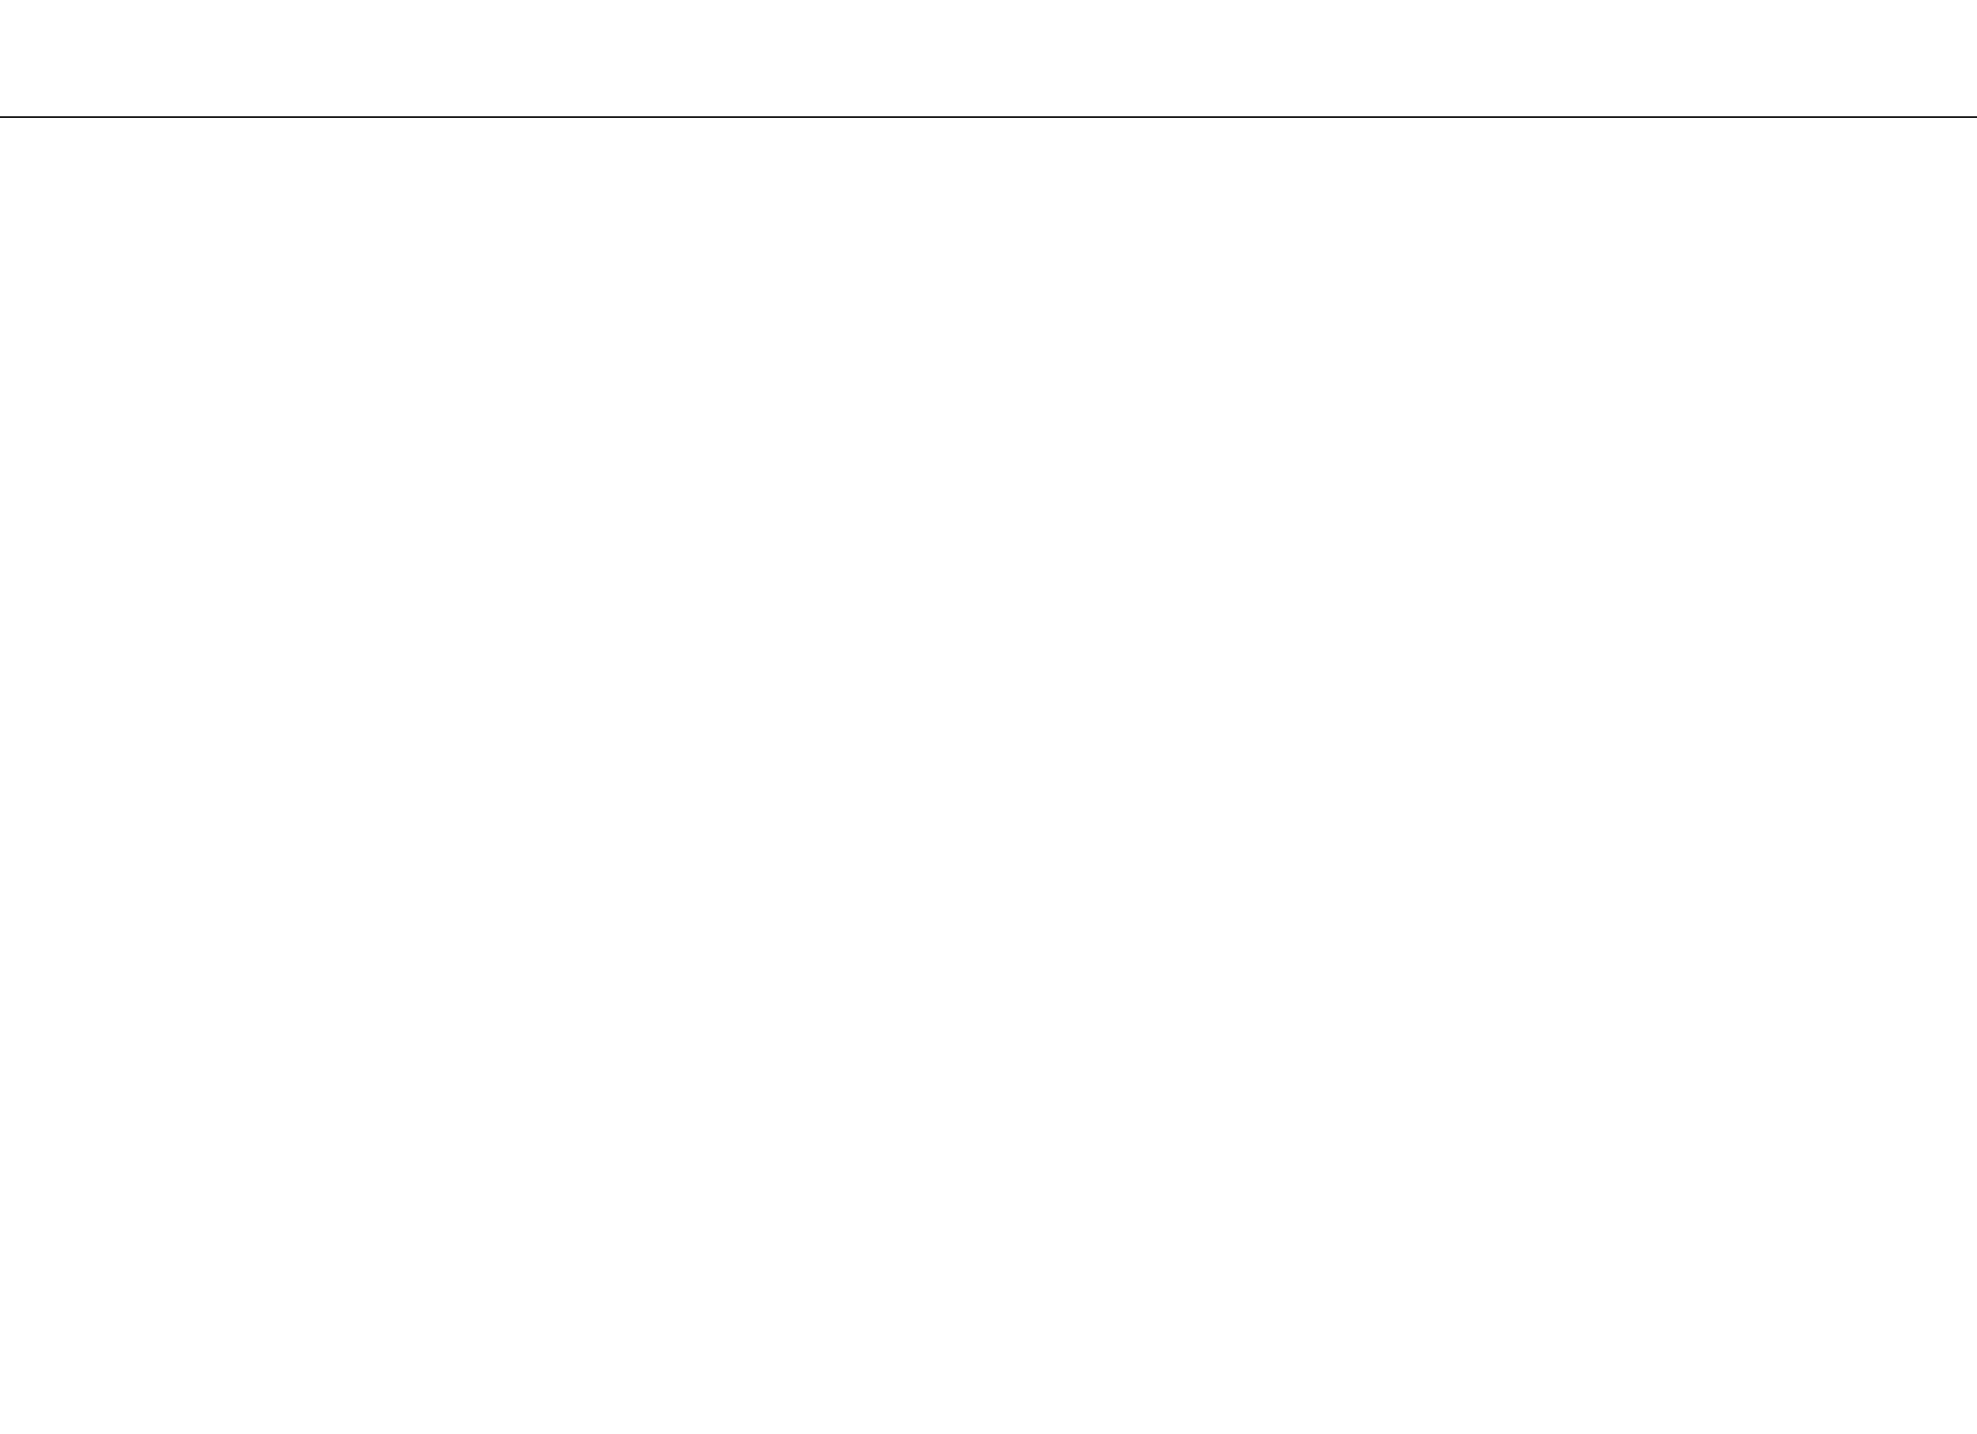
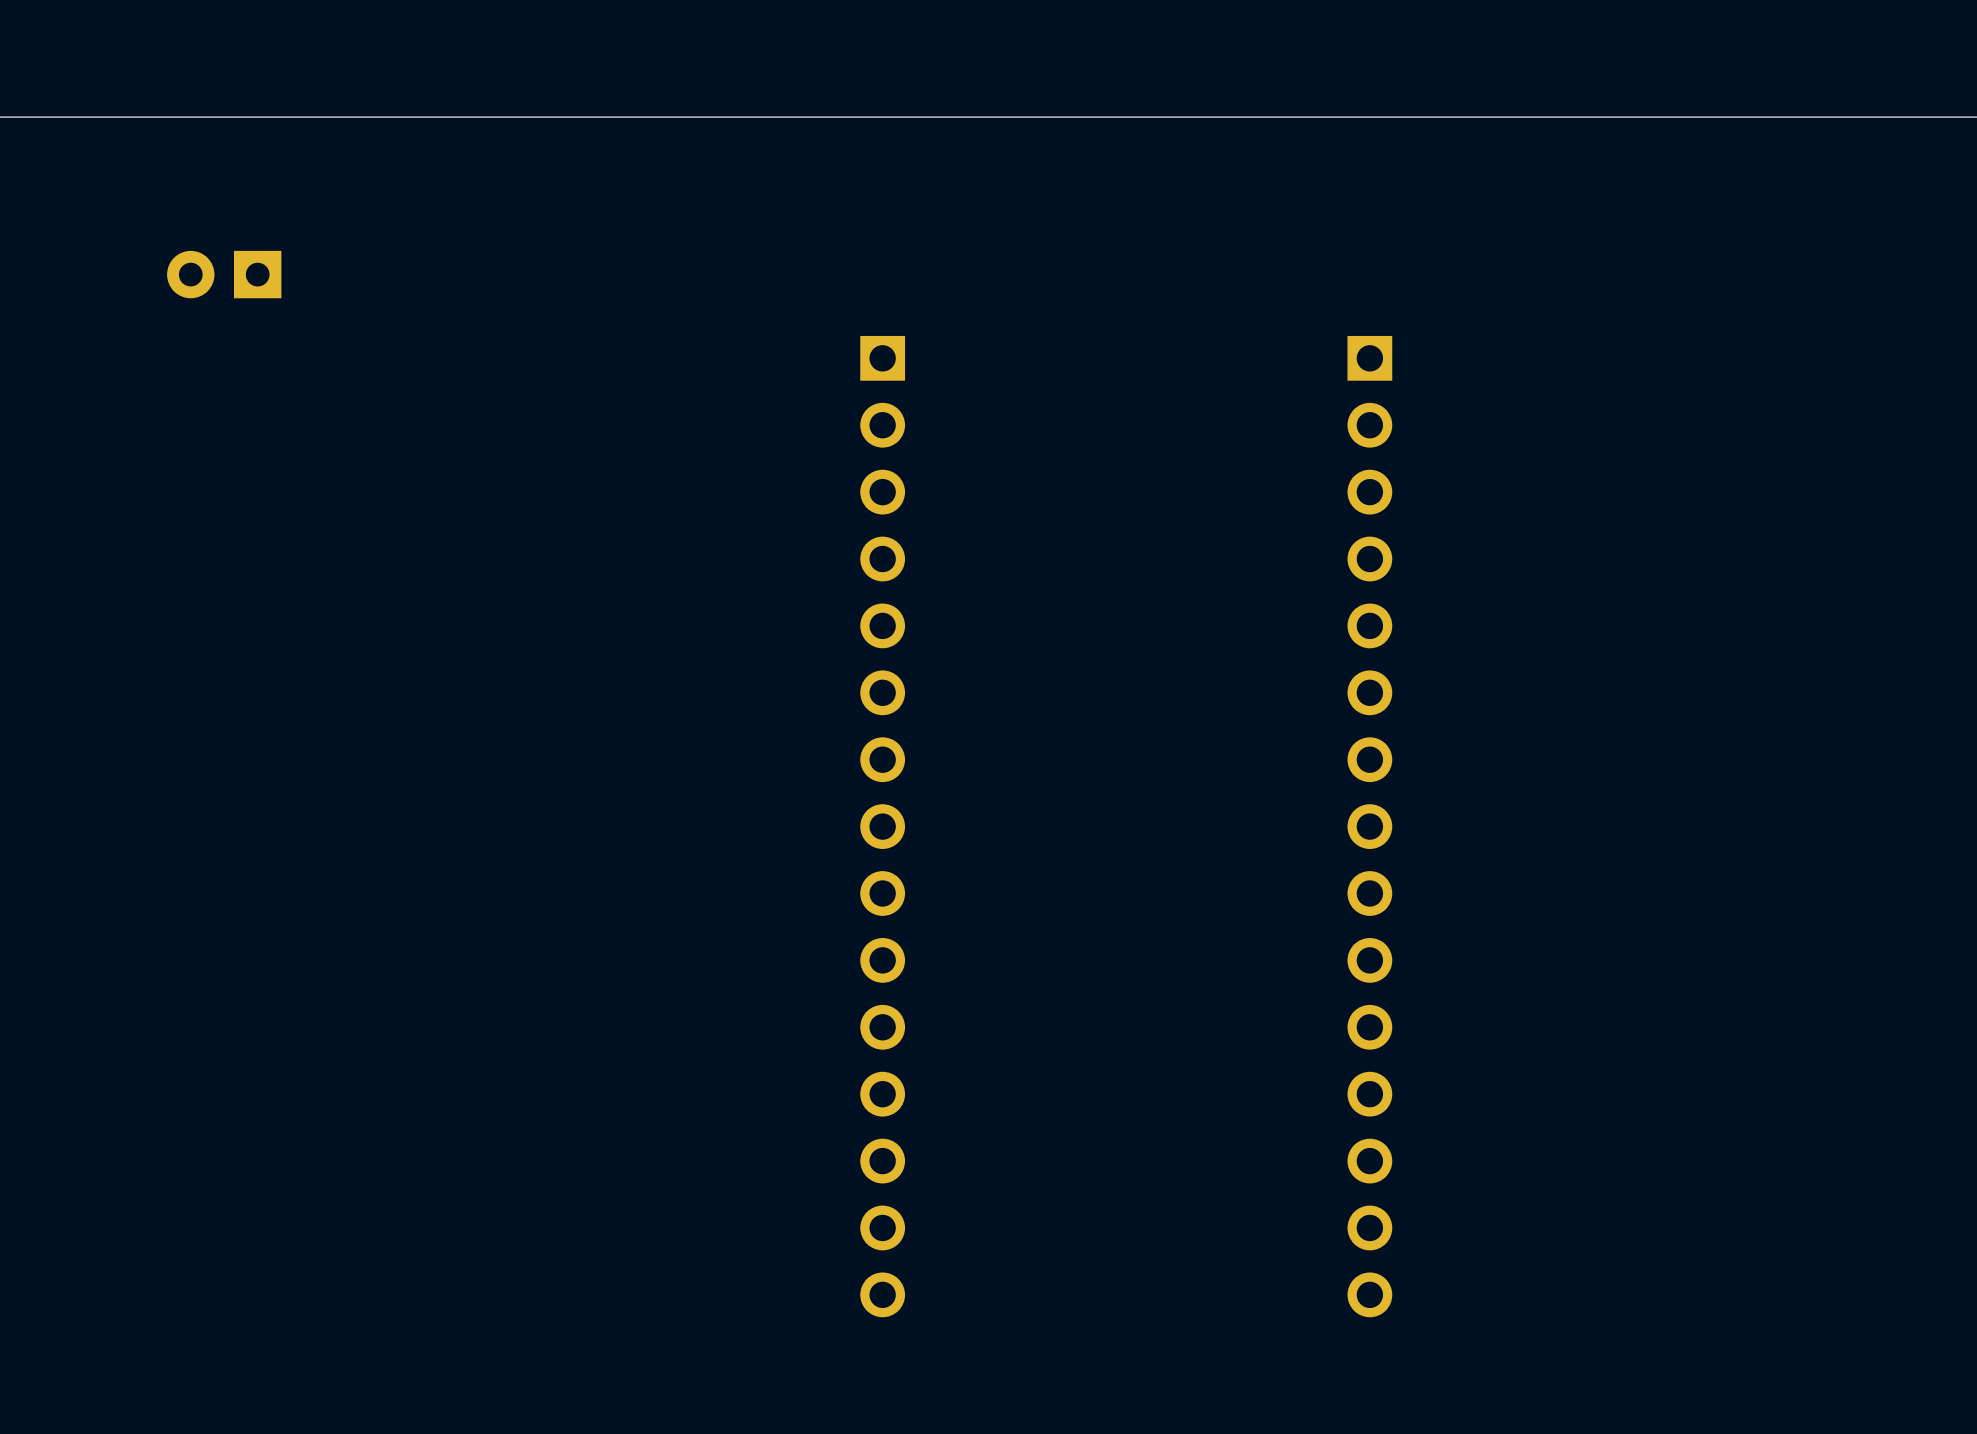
part: none -> (224, 274)
part: none -> (882, 826)
part: none -> (1369, 826)

